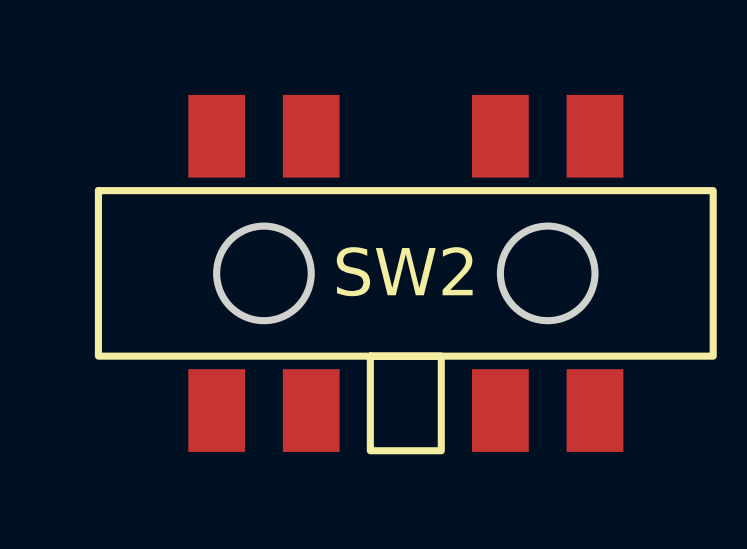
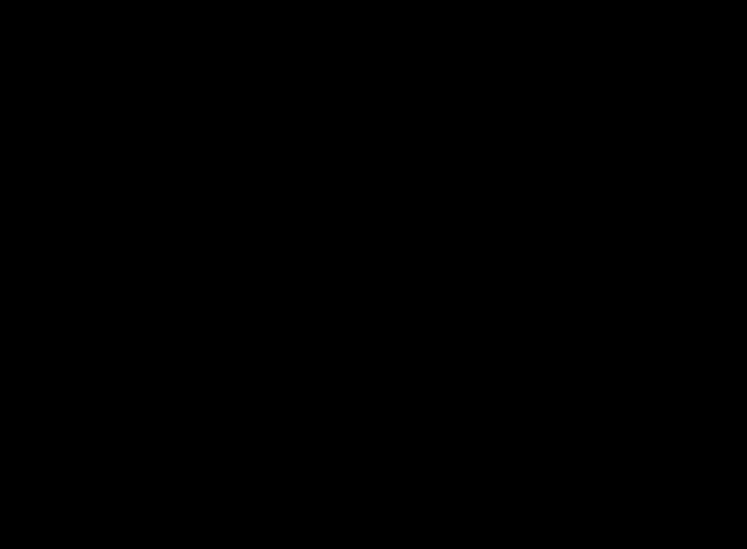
SW2: (405, 274) -> none

